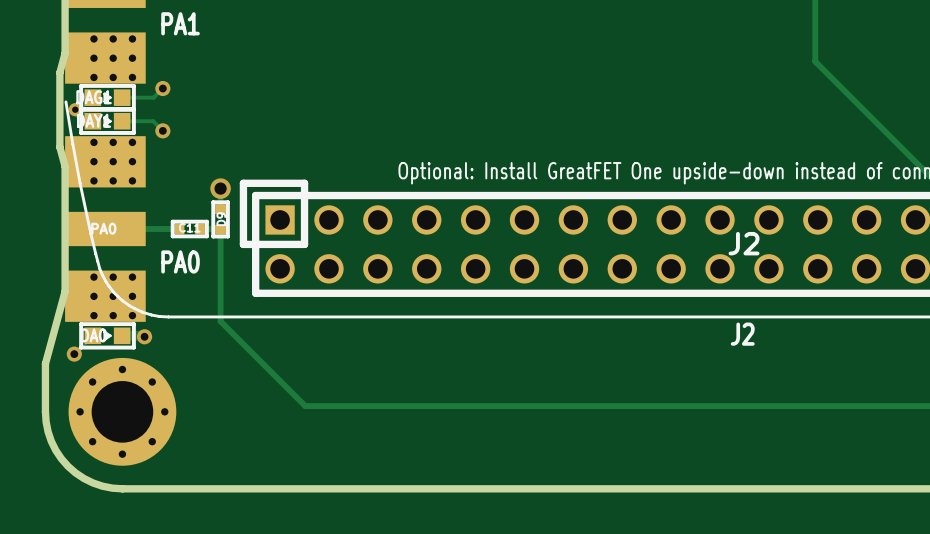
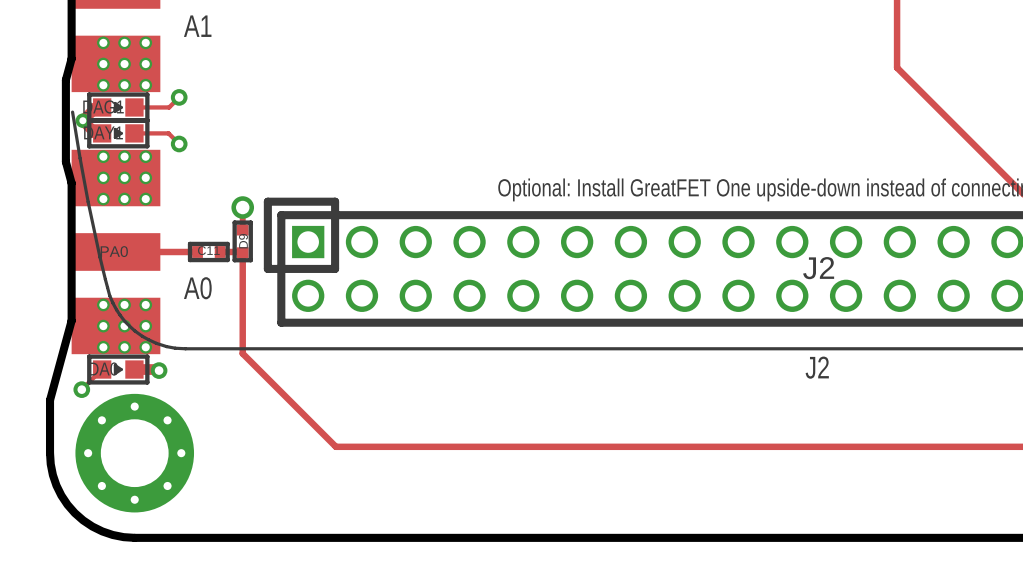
text: PA1 (180, 23) -> A1 (197, 26)
text: PA0 (180, 261) -> A0 (197, 288)

